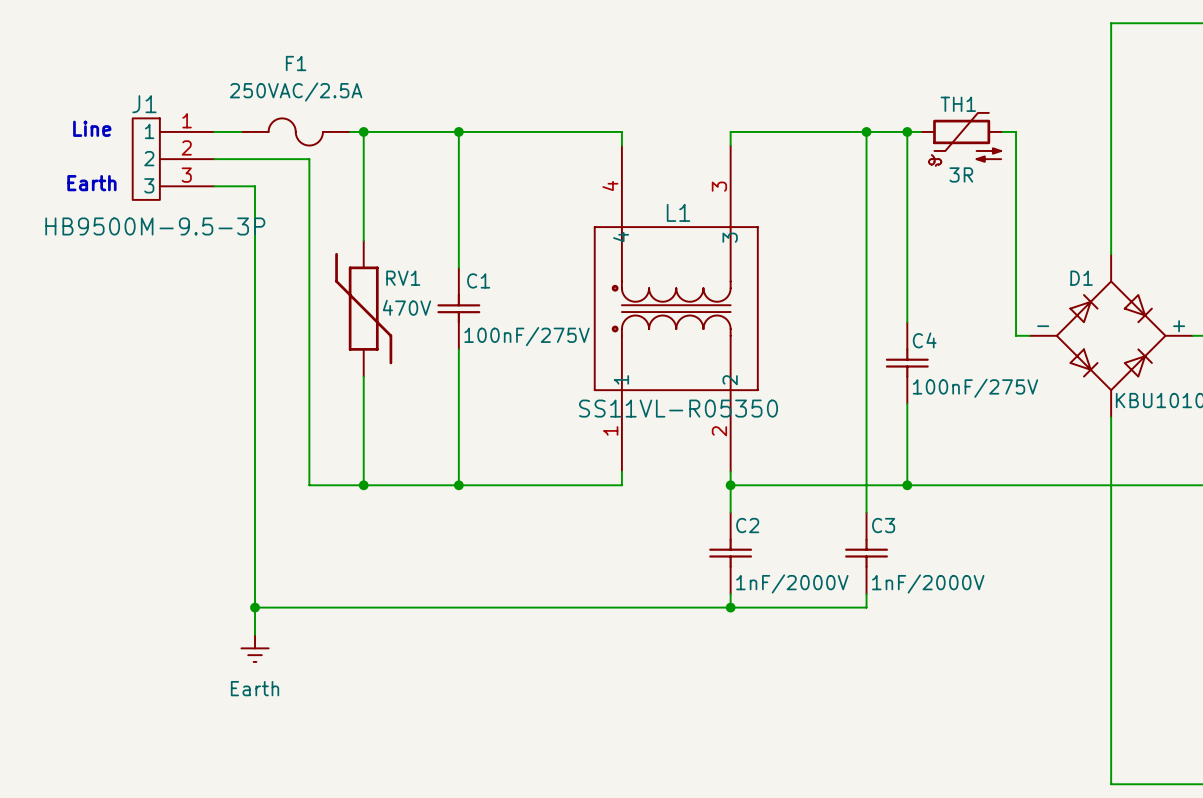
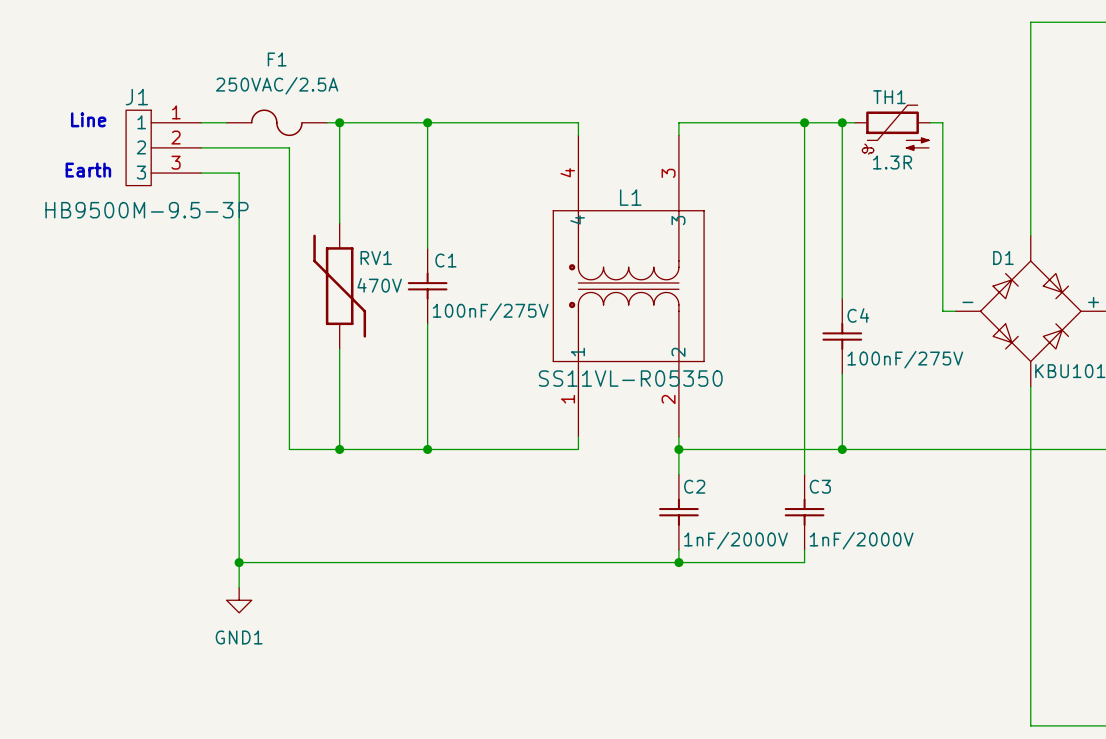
TH1 value: 3R (961, 174) -> 1.3R (892, 162)
power symbol: Earth (255, 648) -> GND1 (239, 600)

